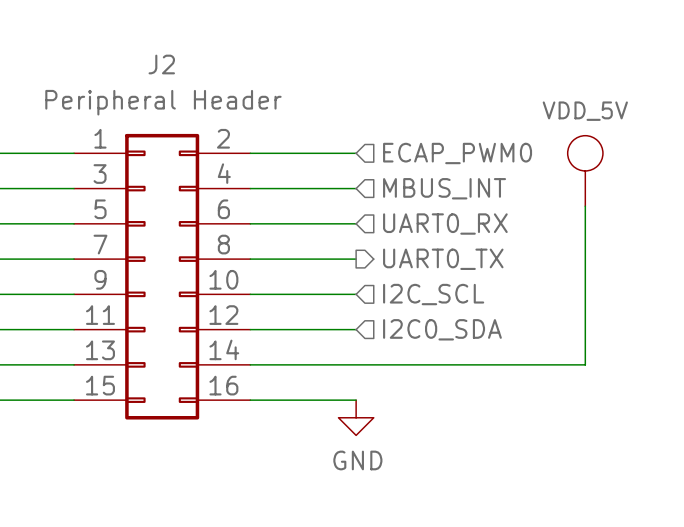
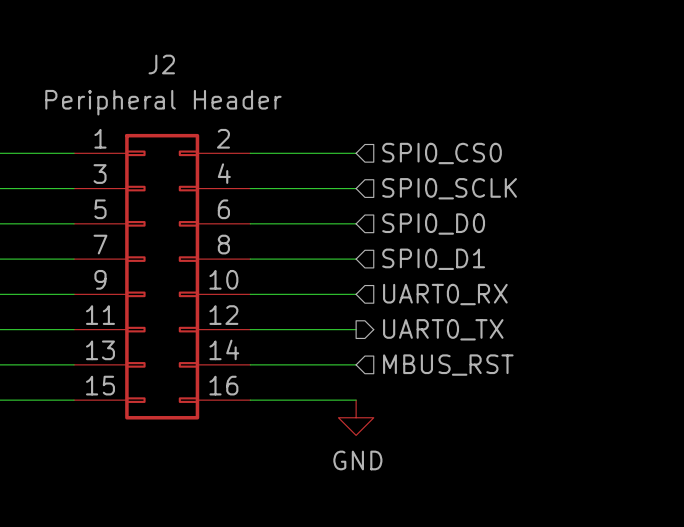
hierarchical label: ECAP_PWM0 (457, 153) -> SPI0_CS0 (442, 153)
power symbol: VDD_5V (585, 170) -> none
hierarchical label: MBUS_INT (444, 188) -> SPI0_SCLK (449, 188)
wire: (585, 206) (585, 364) (356, 364) -> none
hierarchical label: UART0_RX (445, 224) -> SPI0_D0 (433, 224)
hierarchical label shape: output (443, 259) -> input (433, 259)
hierarchical label: UART0_TX (443, 259) -> SPI0_D1 (433, 259)
hierarchical label: I2C_SCL (433, 294) -> UART0_RX (445, 294)
hierarchical label shape: input (442, 329) -> output (443, 329)
hierarchical label: I2C0_SDA (442, 329) -> UART0_TX (443, 329)
hierarchical label: none -> MBUS_RST (448, 365)

